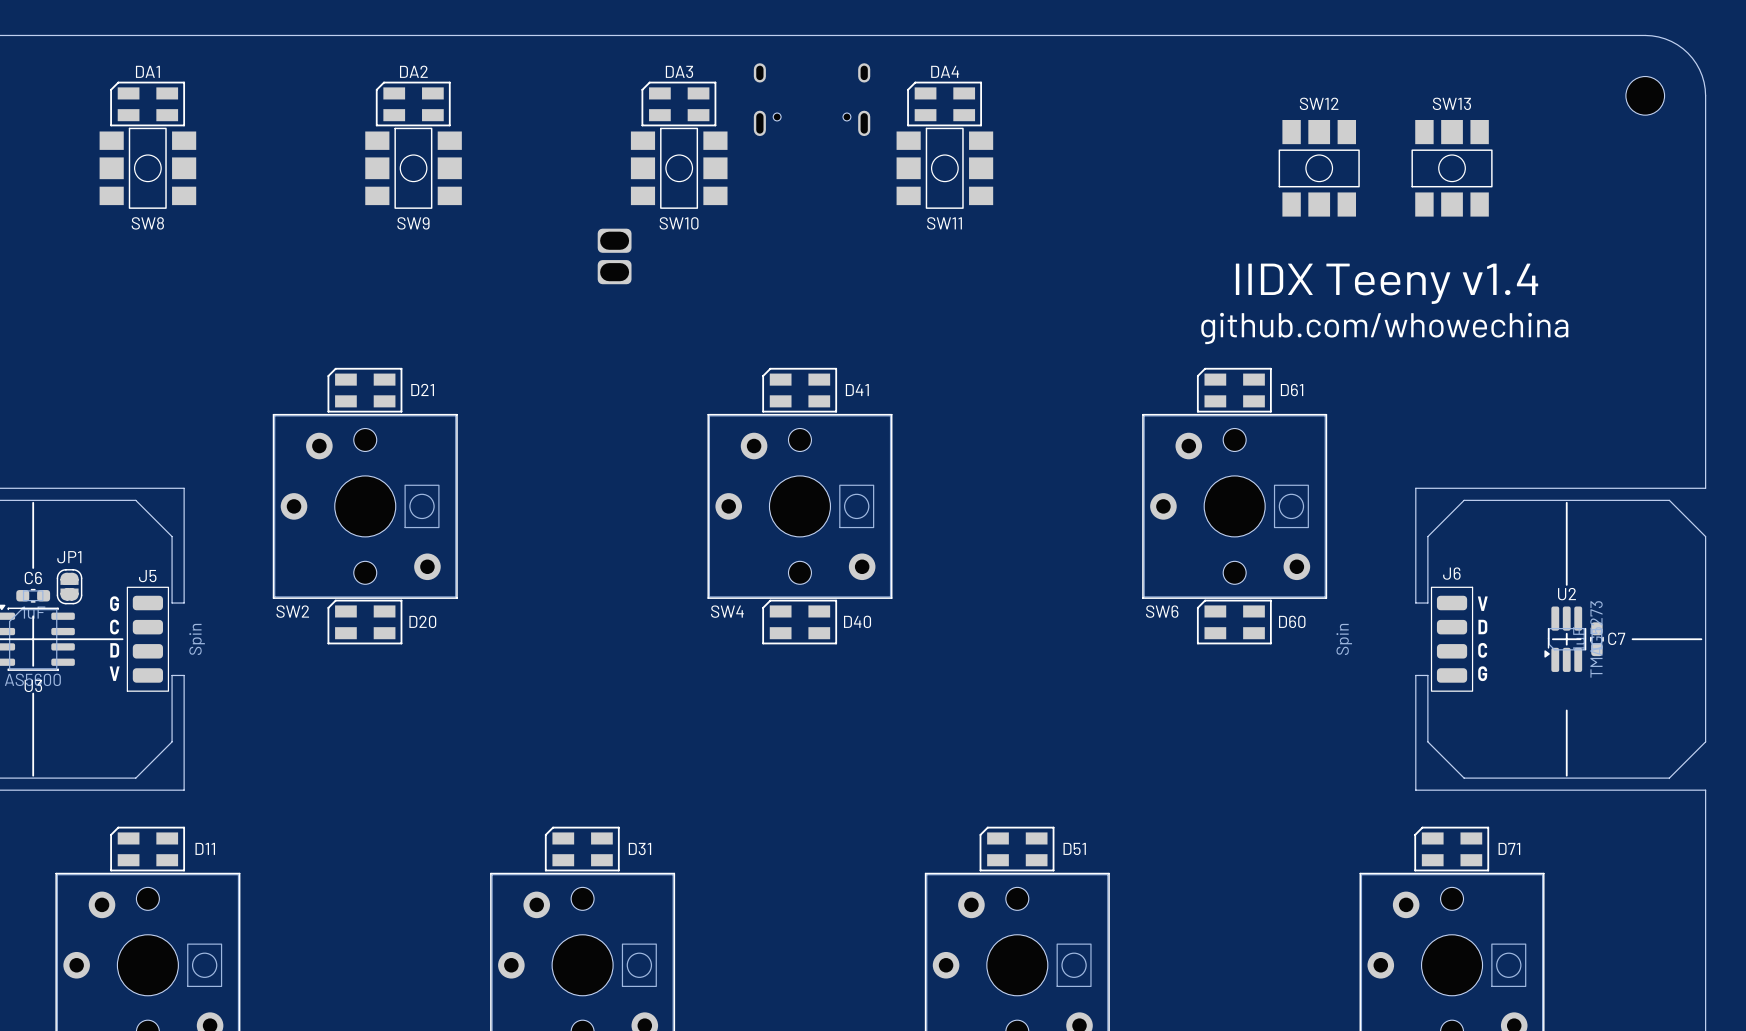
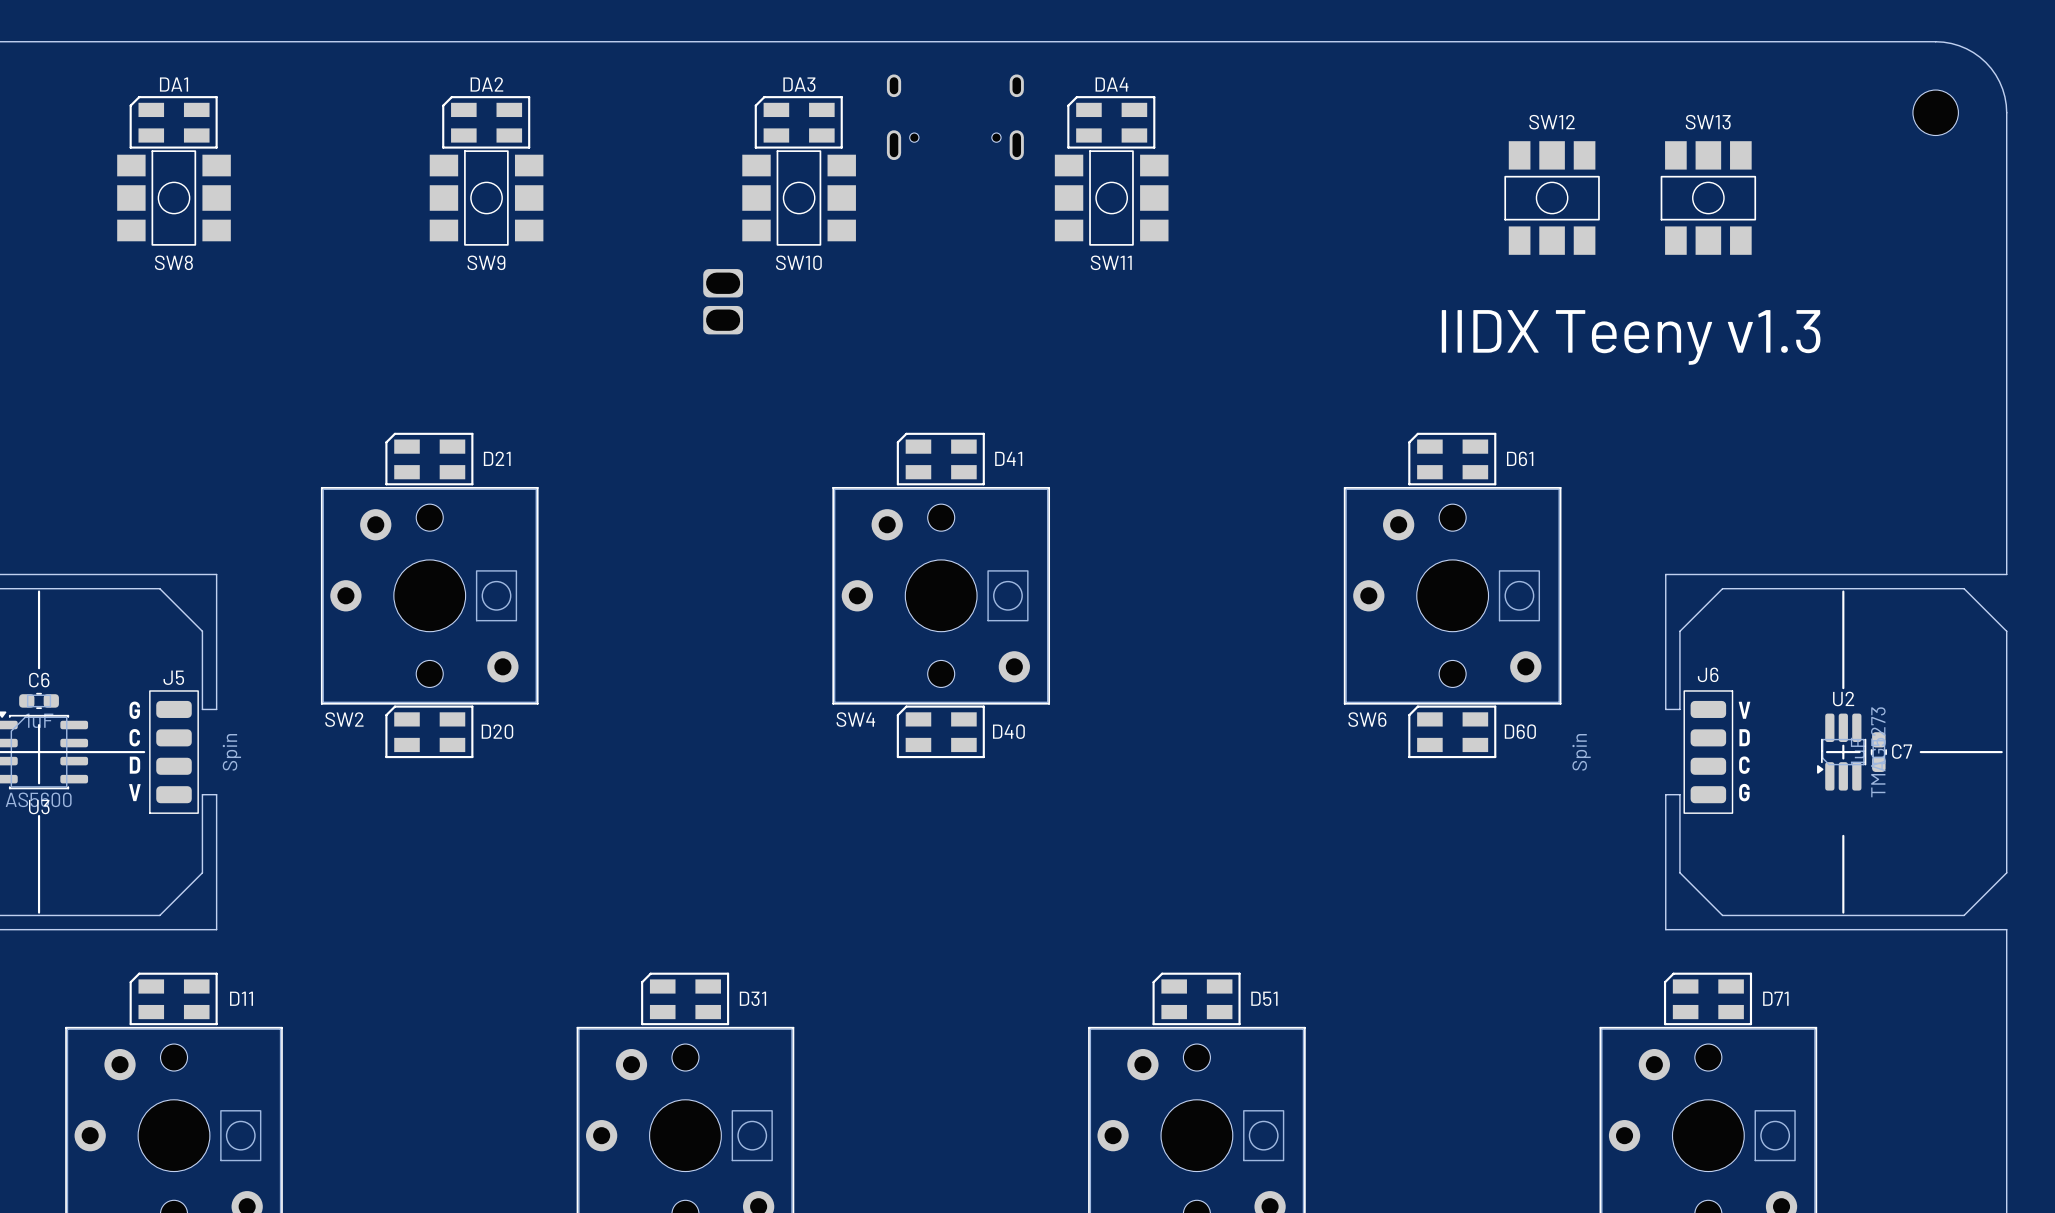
text: IIDX Teeny v1.4 (1387, 283) -> IIDX Teeny v1.3 (1631, 337)
text: github.com/whowechina (1384, 328) -> none
JP1: (69, 586) -> none

